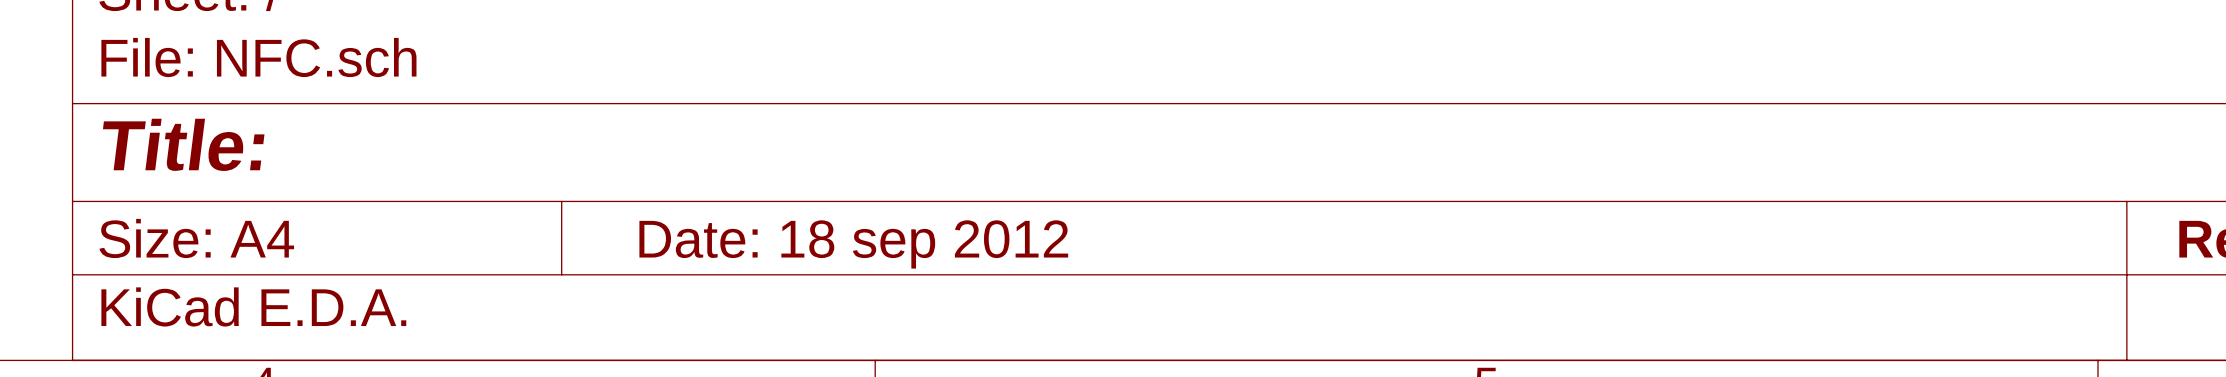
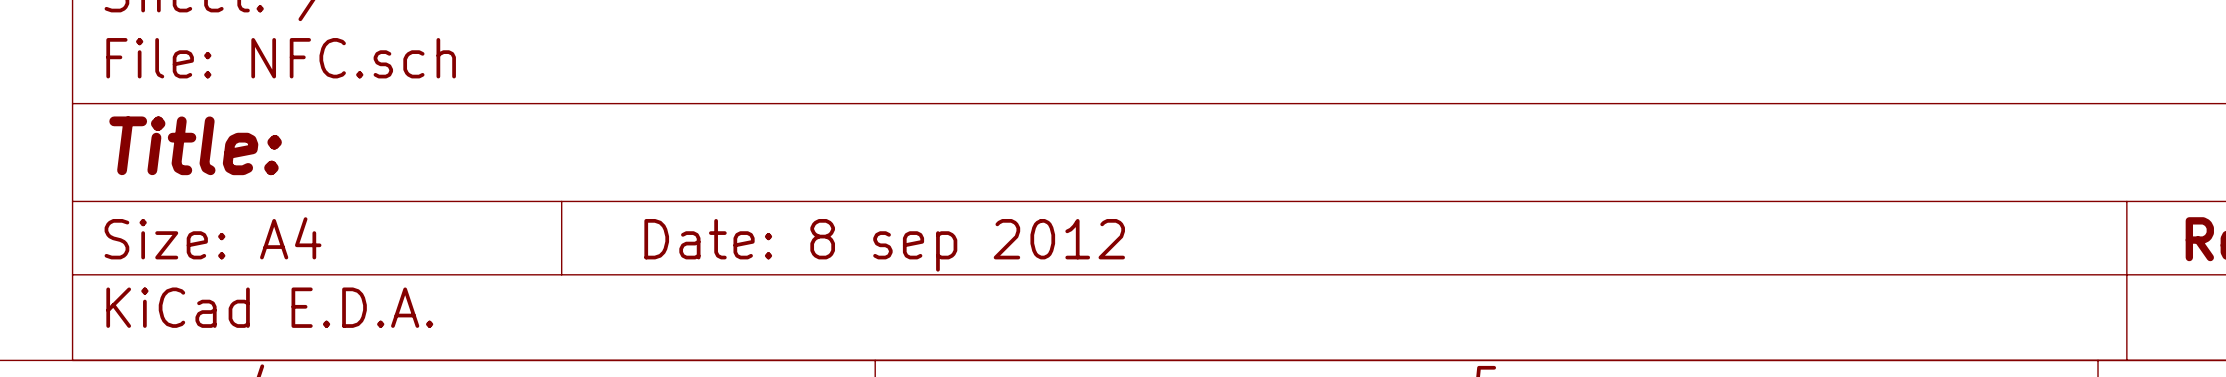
title block: Date: 18 sep 2012 (853, 244) -> Date: 8 sep 2012 (884, 245)

